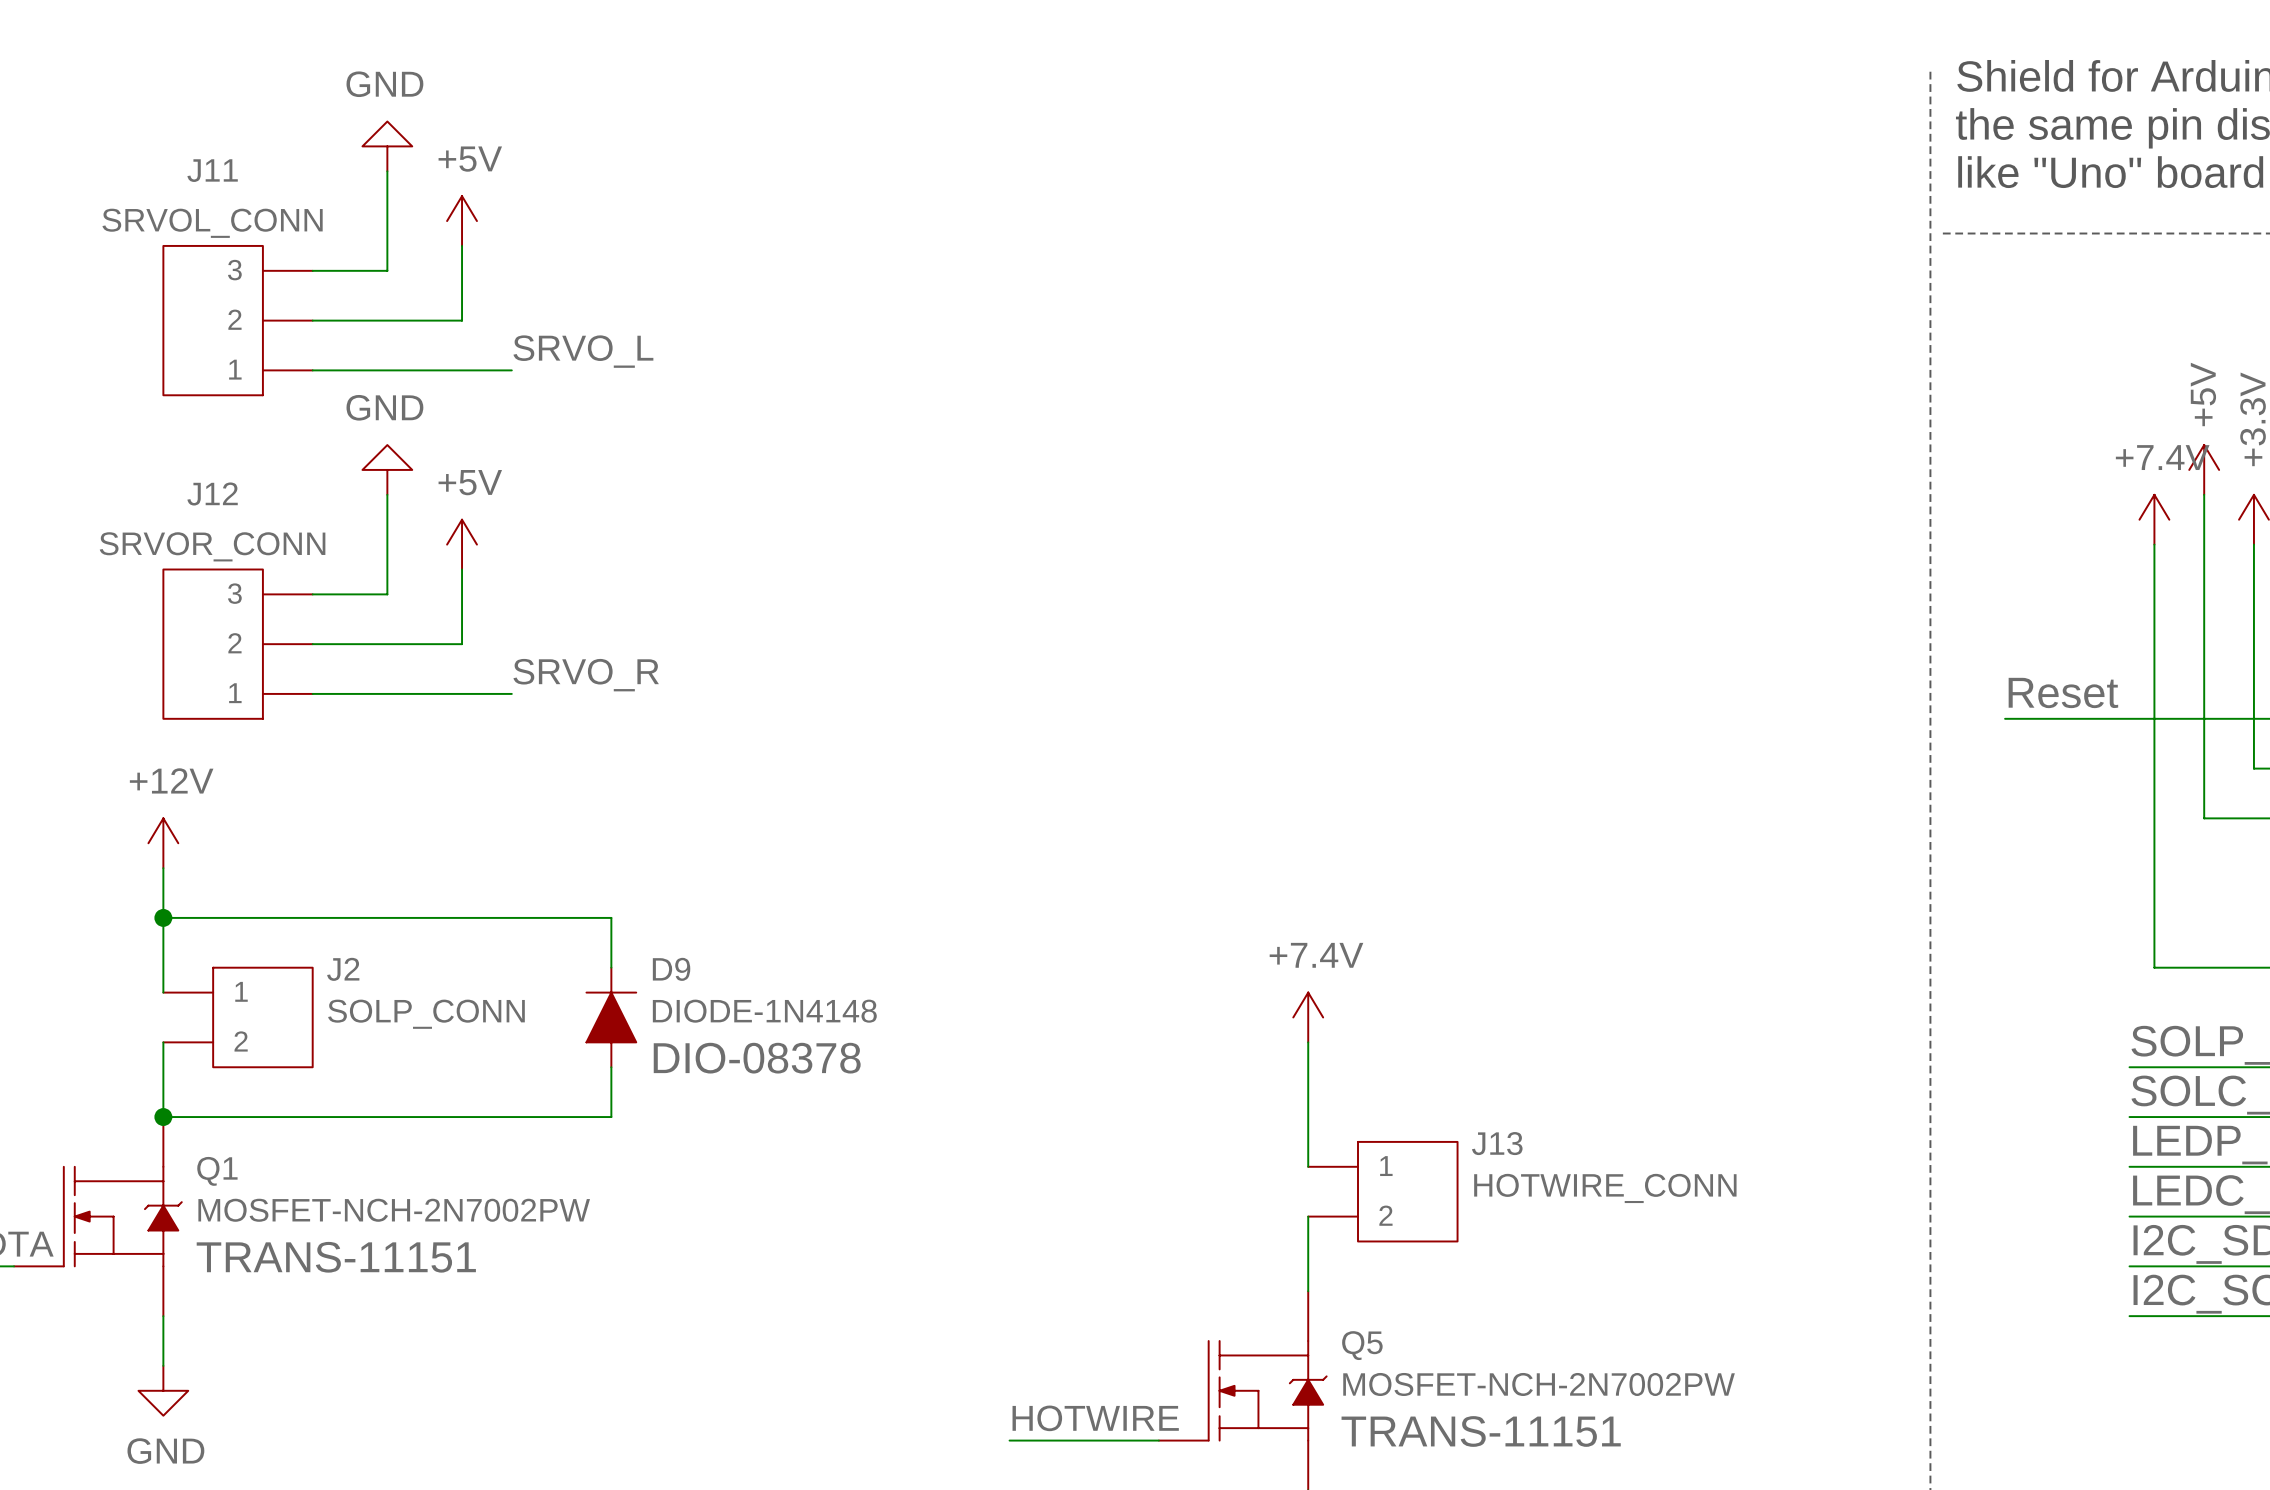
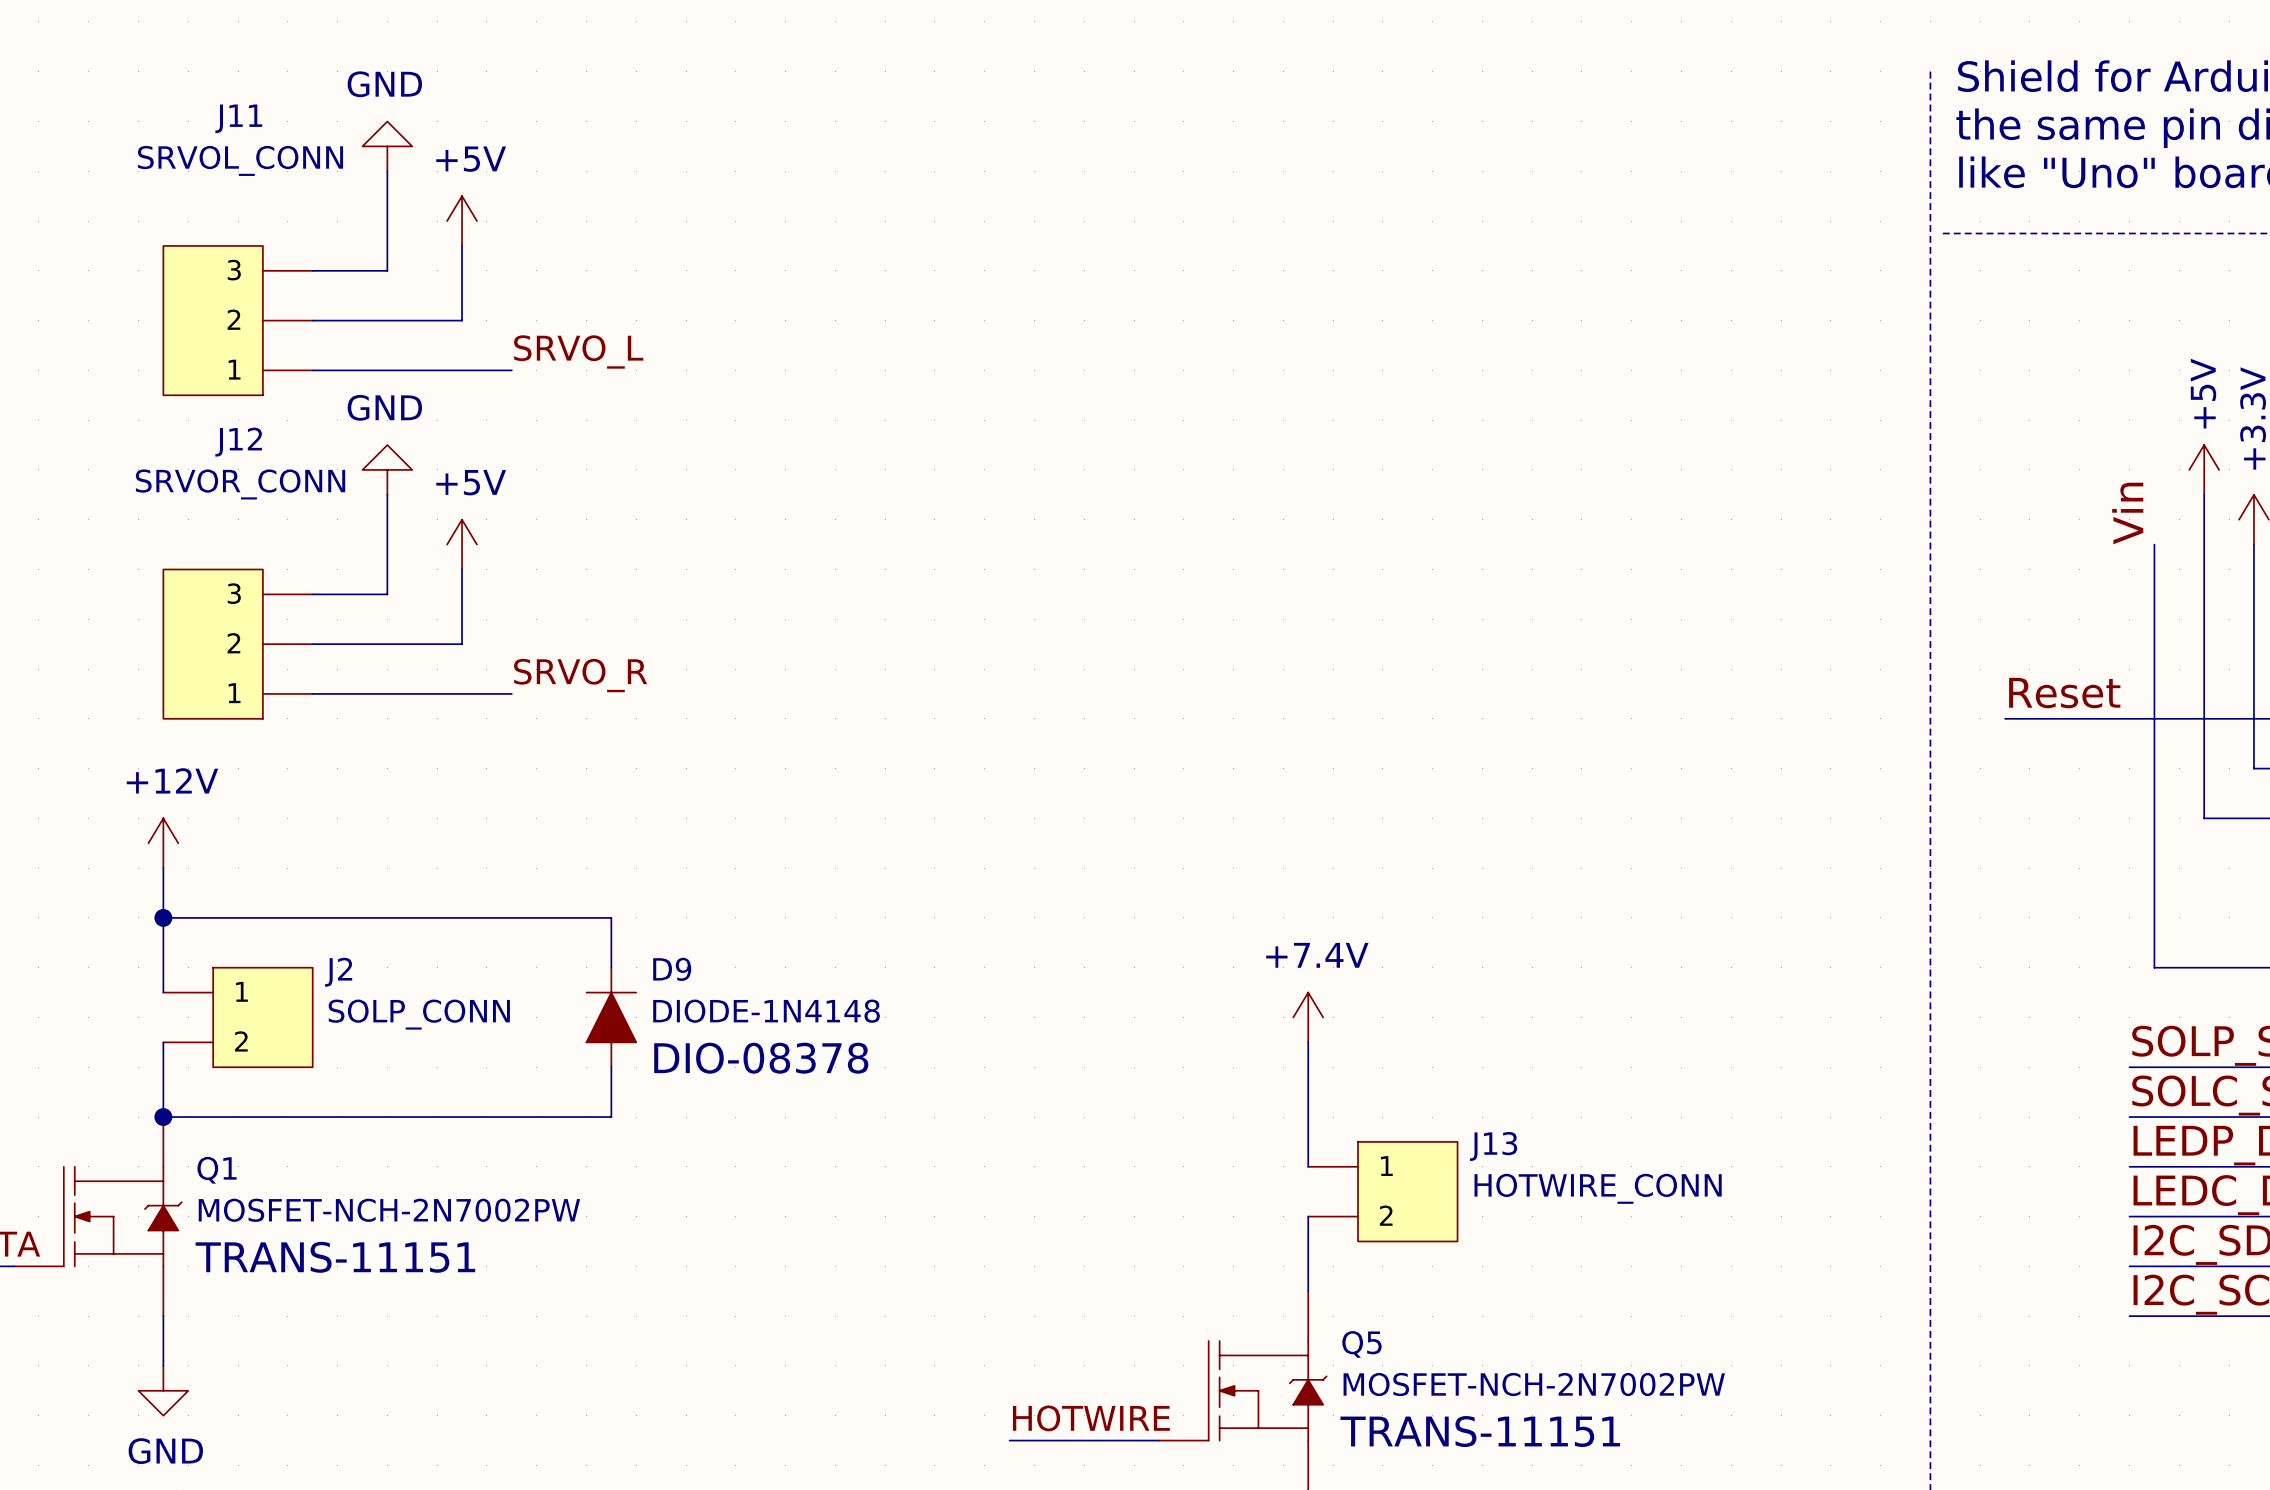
J11 name position: J11 (212, 170) -> J11 (238, 118)
J11 value position: SRVOL_CONN (212, 223) -> SRVOL_CONN (240, 160)
J12 name position: J12 (212, 493) -> J12 (238, 442)
label: none -> Vin (2127, 513)
power symbol: (2154, 519) -> none
J12 value position: SRVOR_CONN (212, 546) -> SRVOR_CONN (240, 484)

